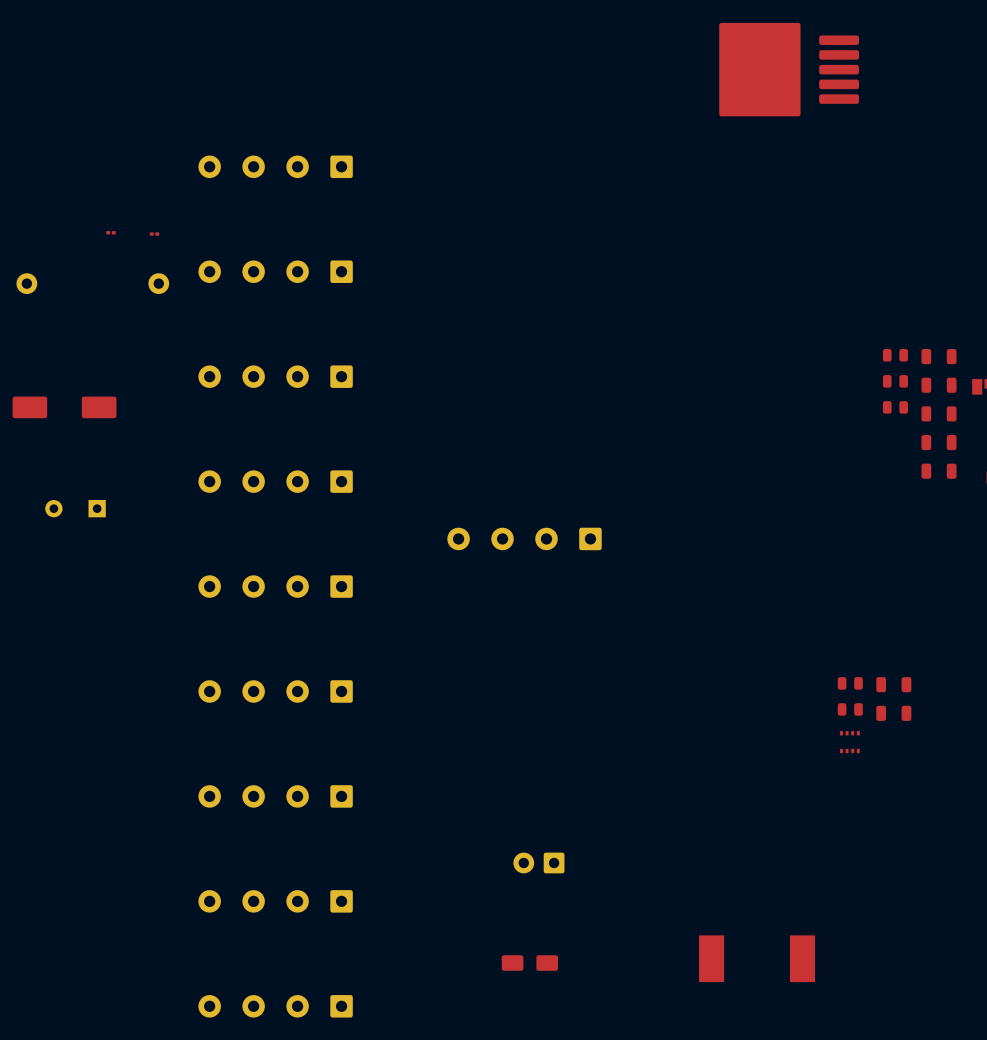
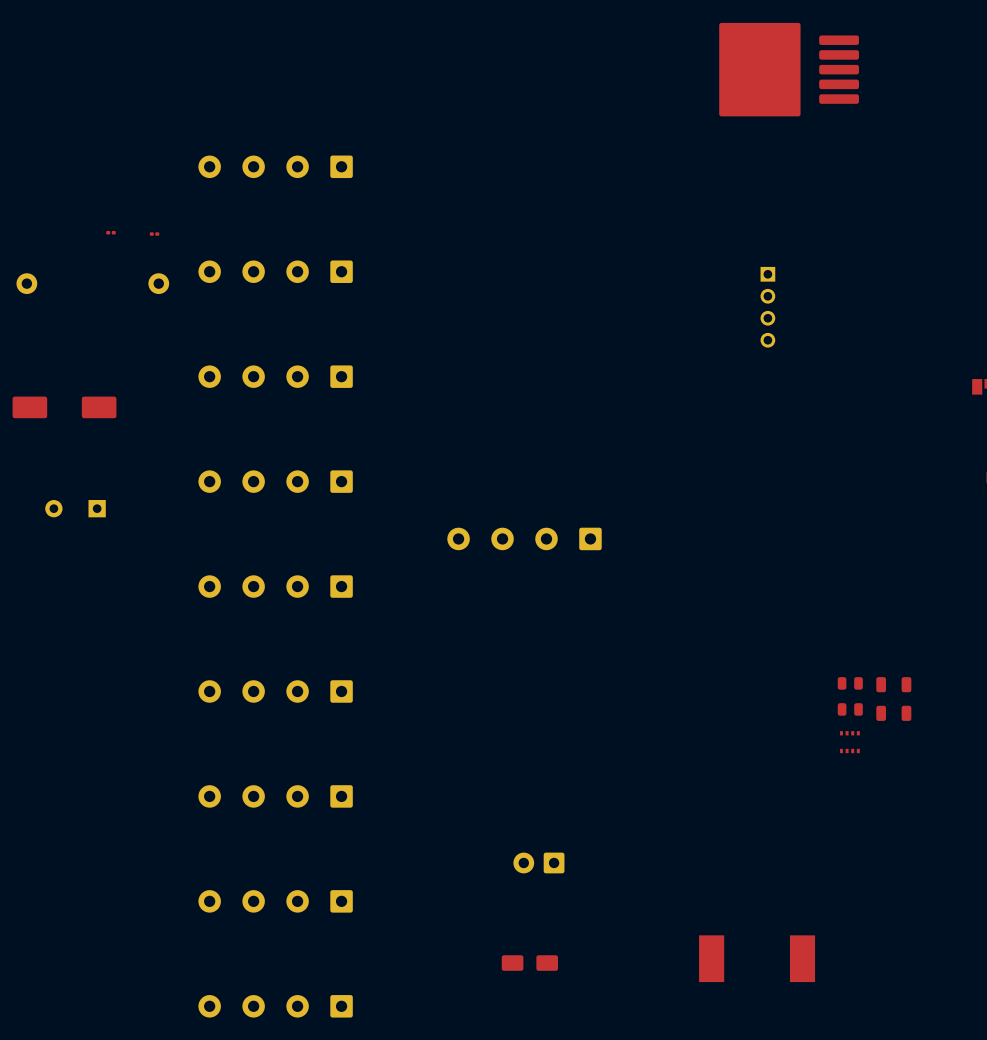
part: none -> (767, 307)
part: (895, 355) -> none
part: (939, 356) -> none
part: (895, 381) -> none
part: (939, 385) -> none
part: (895, 407) -> none
part: (939, 413) -> none
part: (939, 442) -> none
part: (939, 471) -> none

